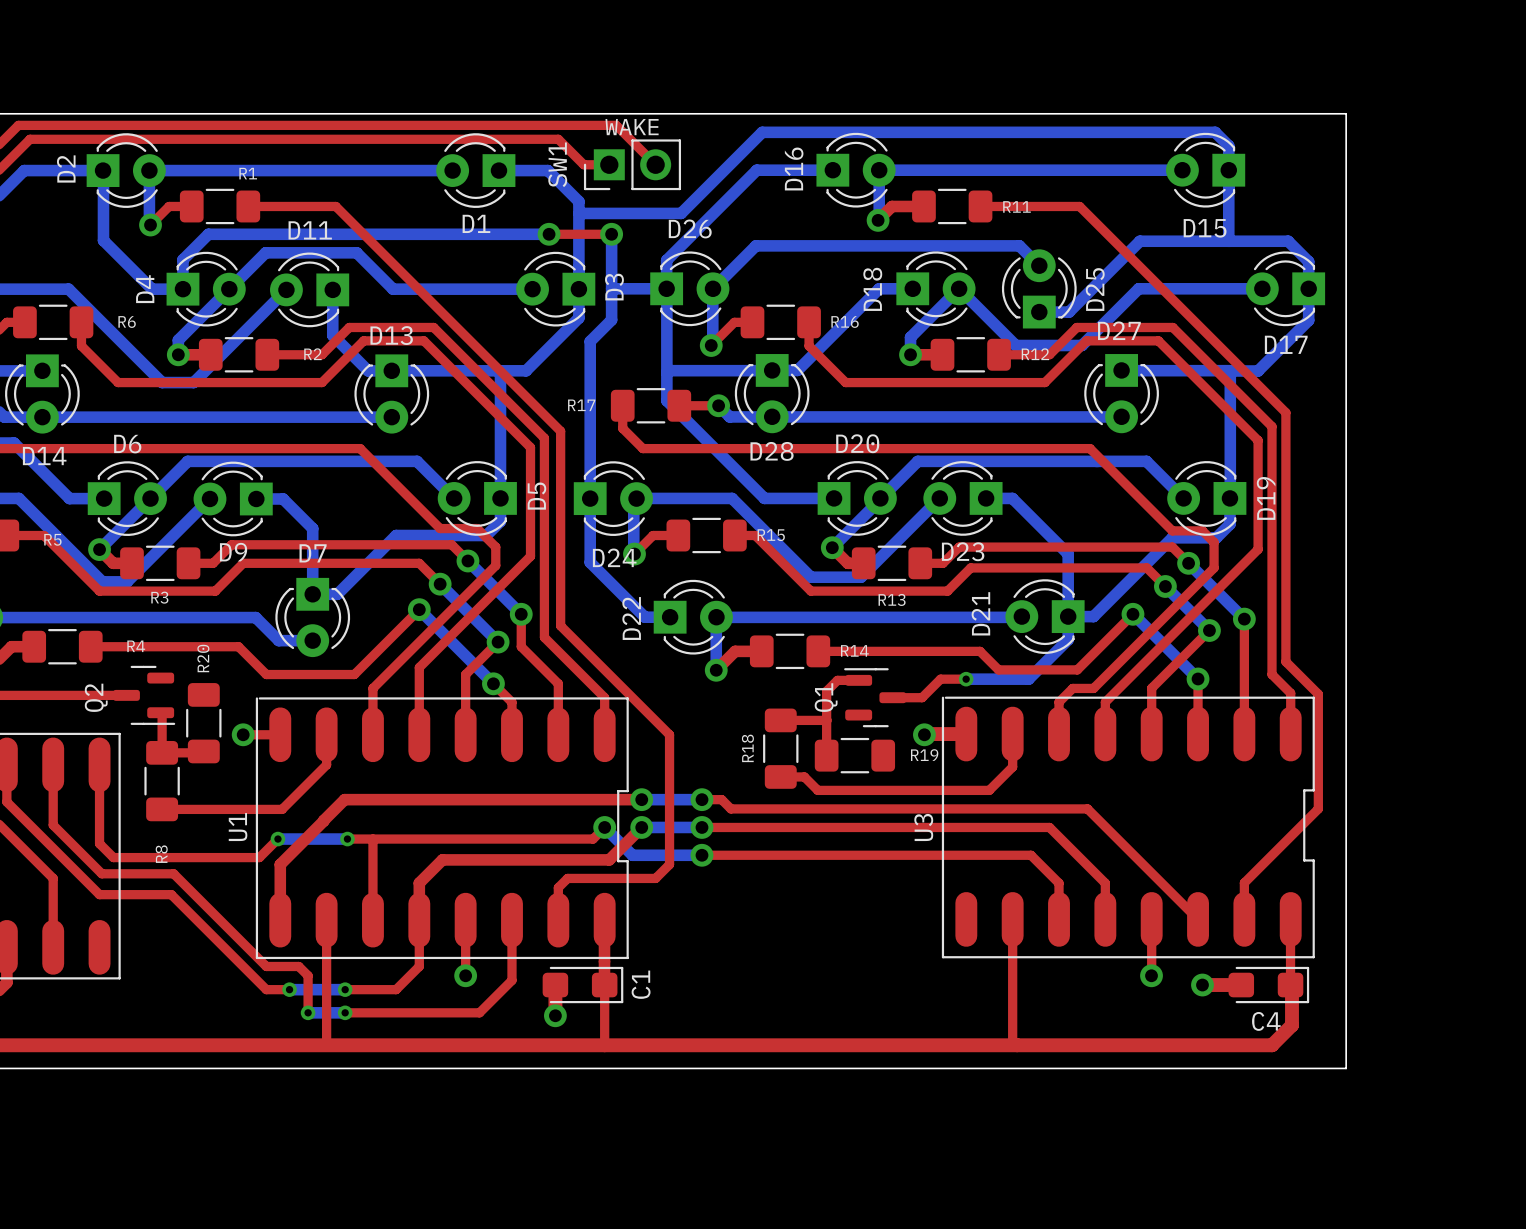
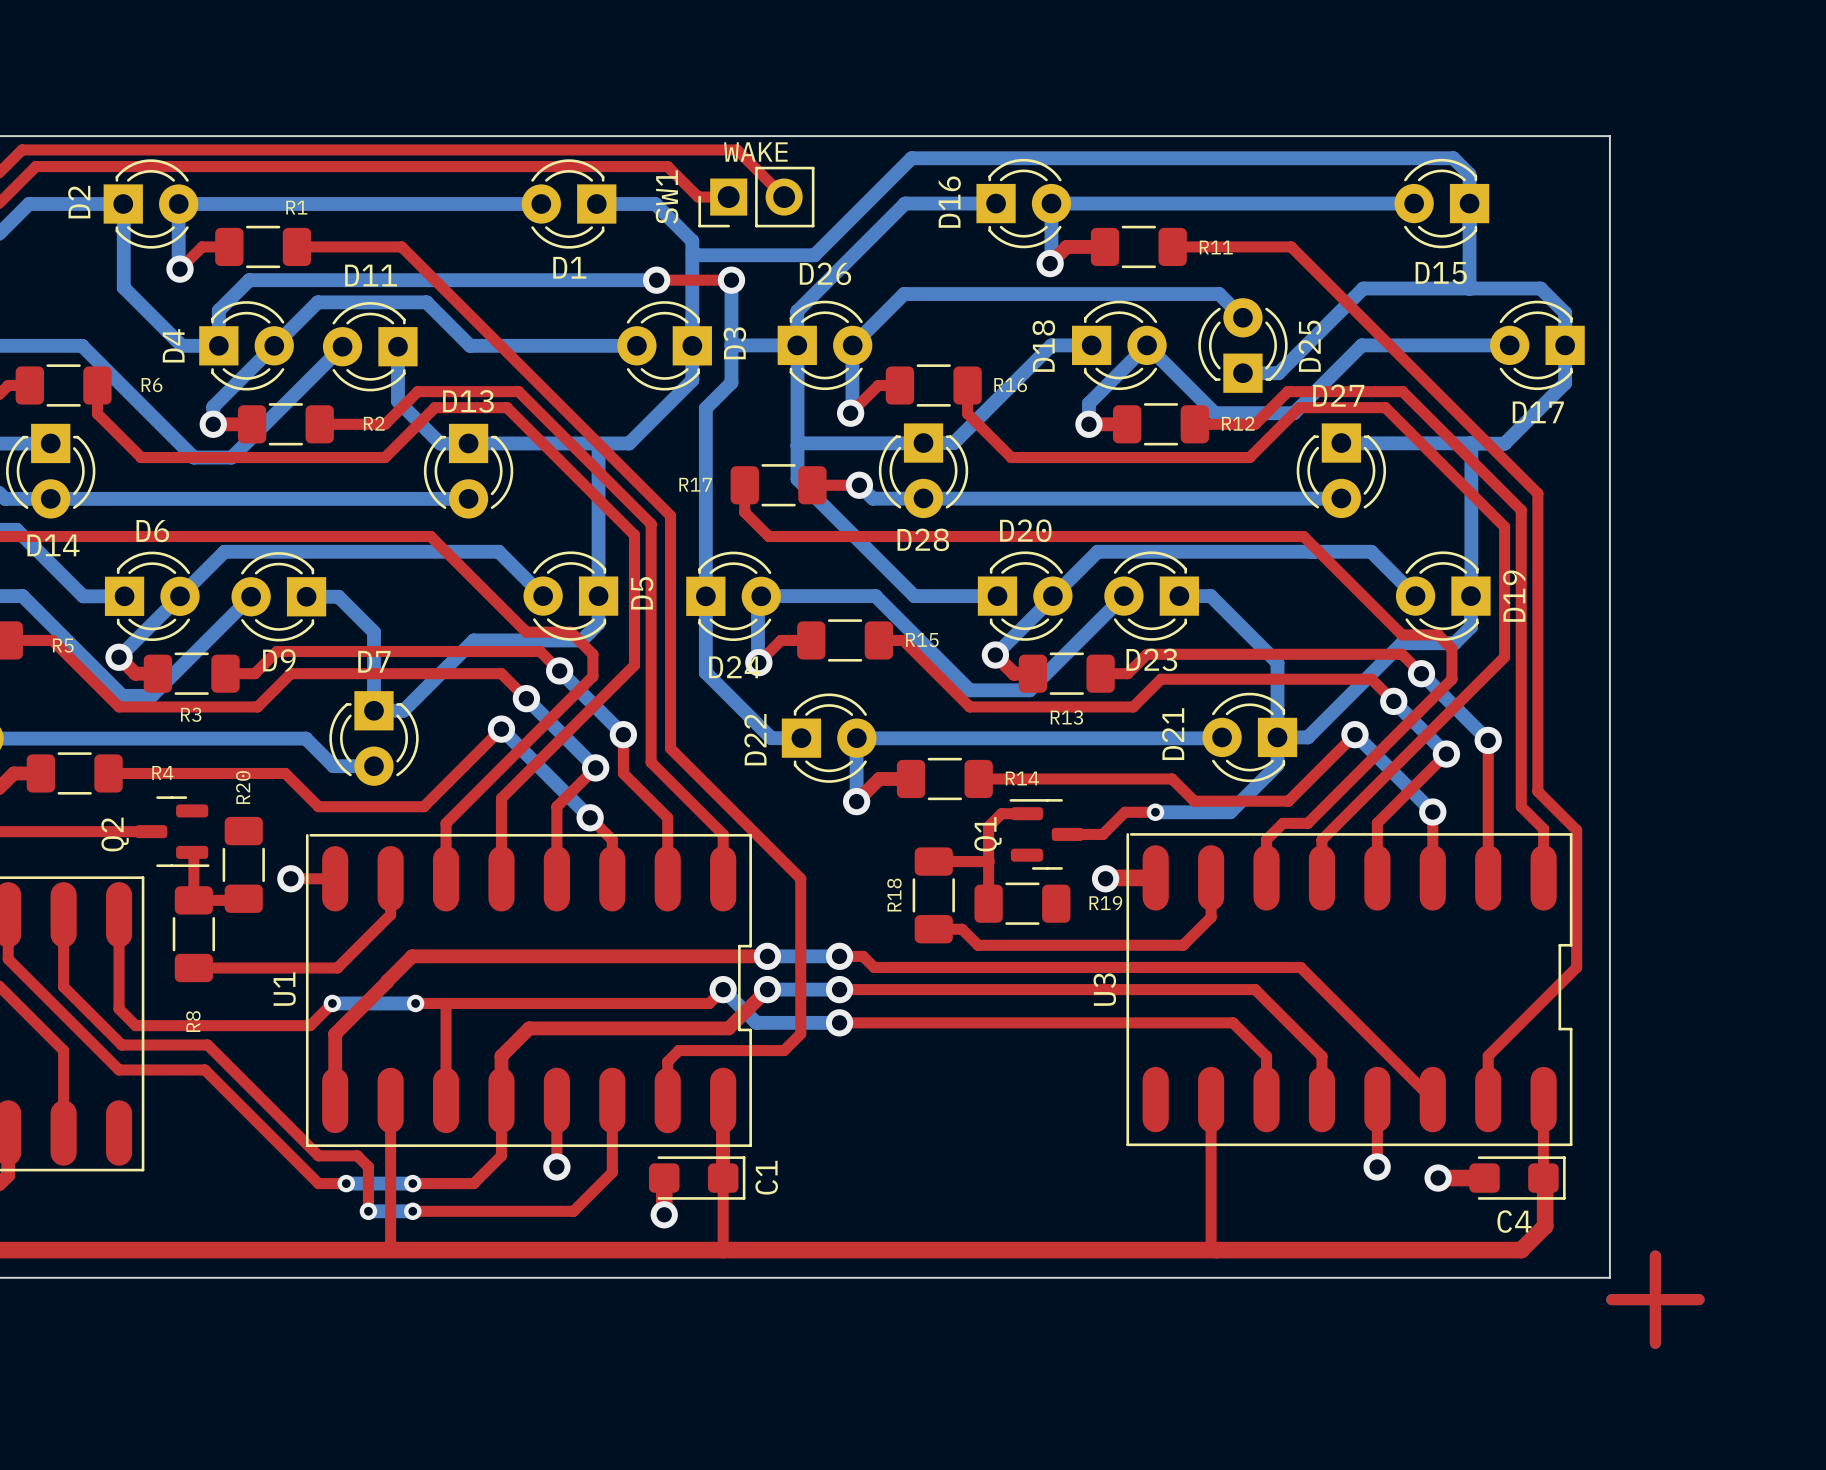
top track: none -> (1655, 1255) (1655, 1343)
top track: none -> (1611, 1299) (1699, 1299)

